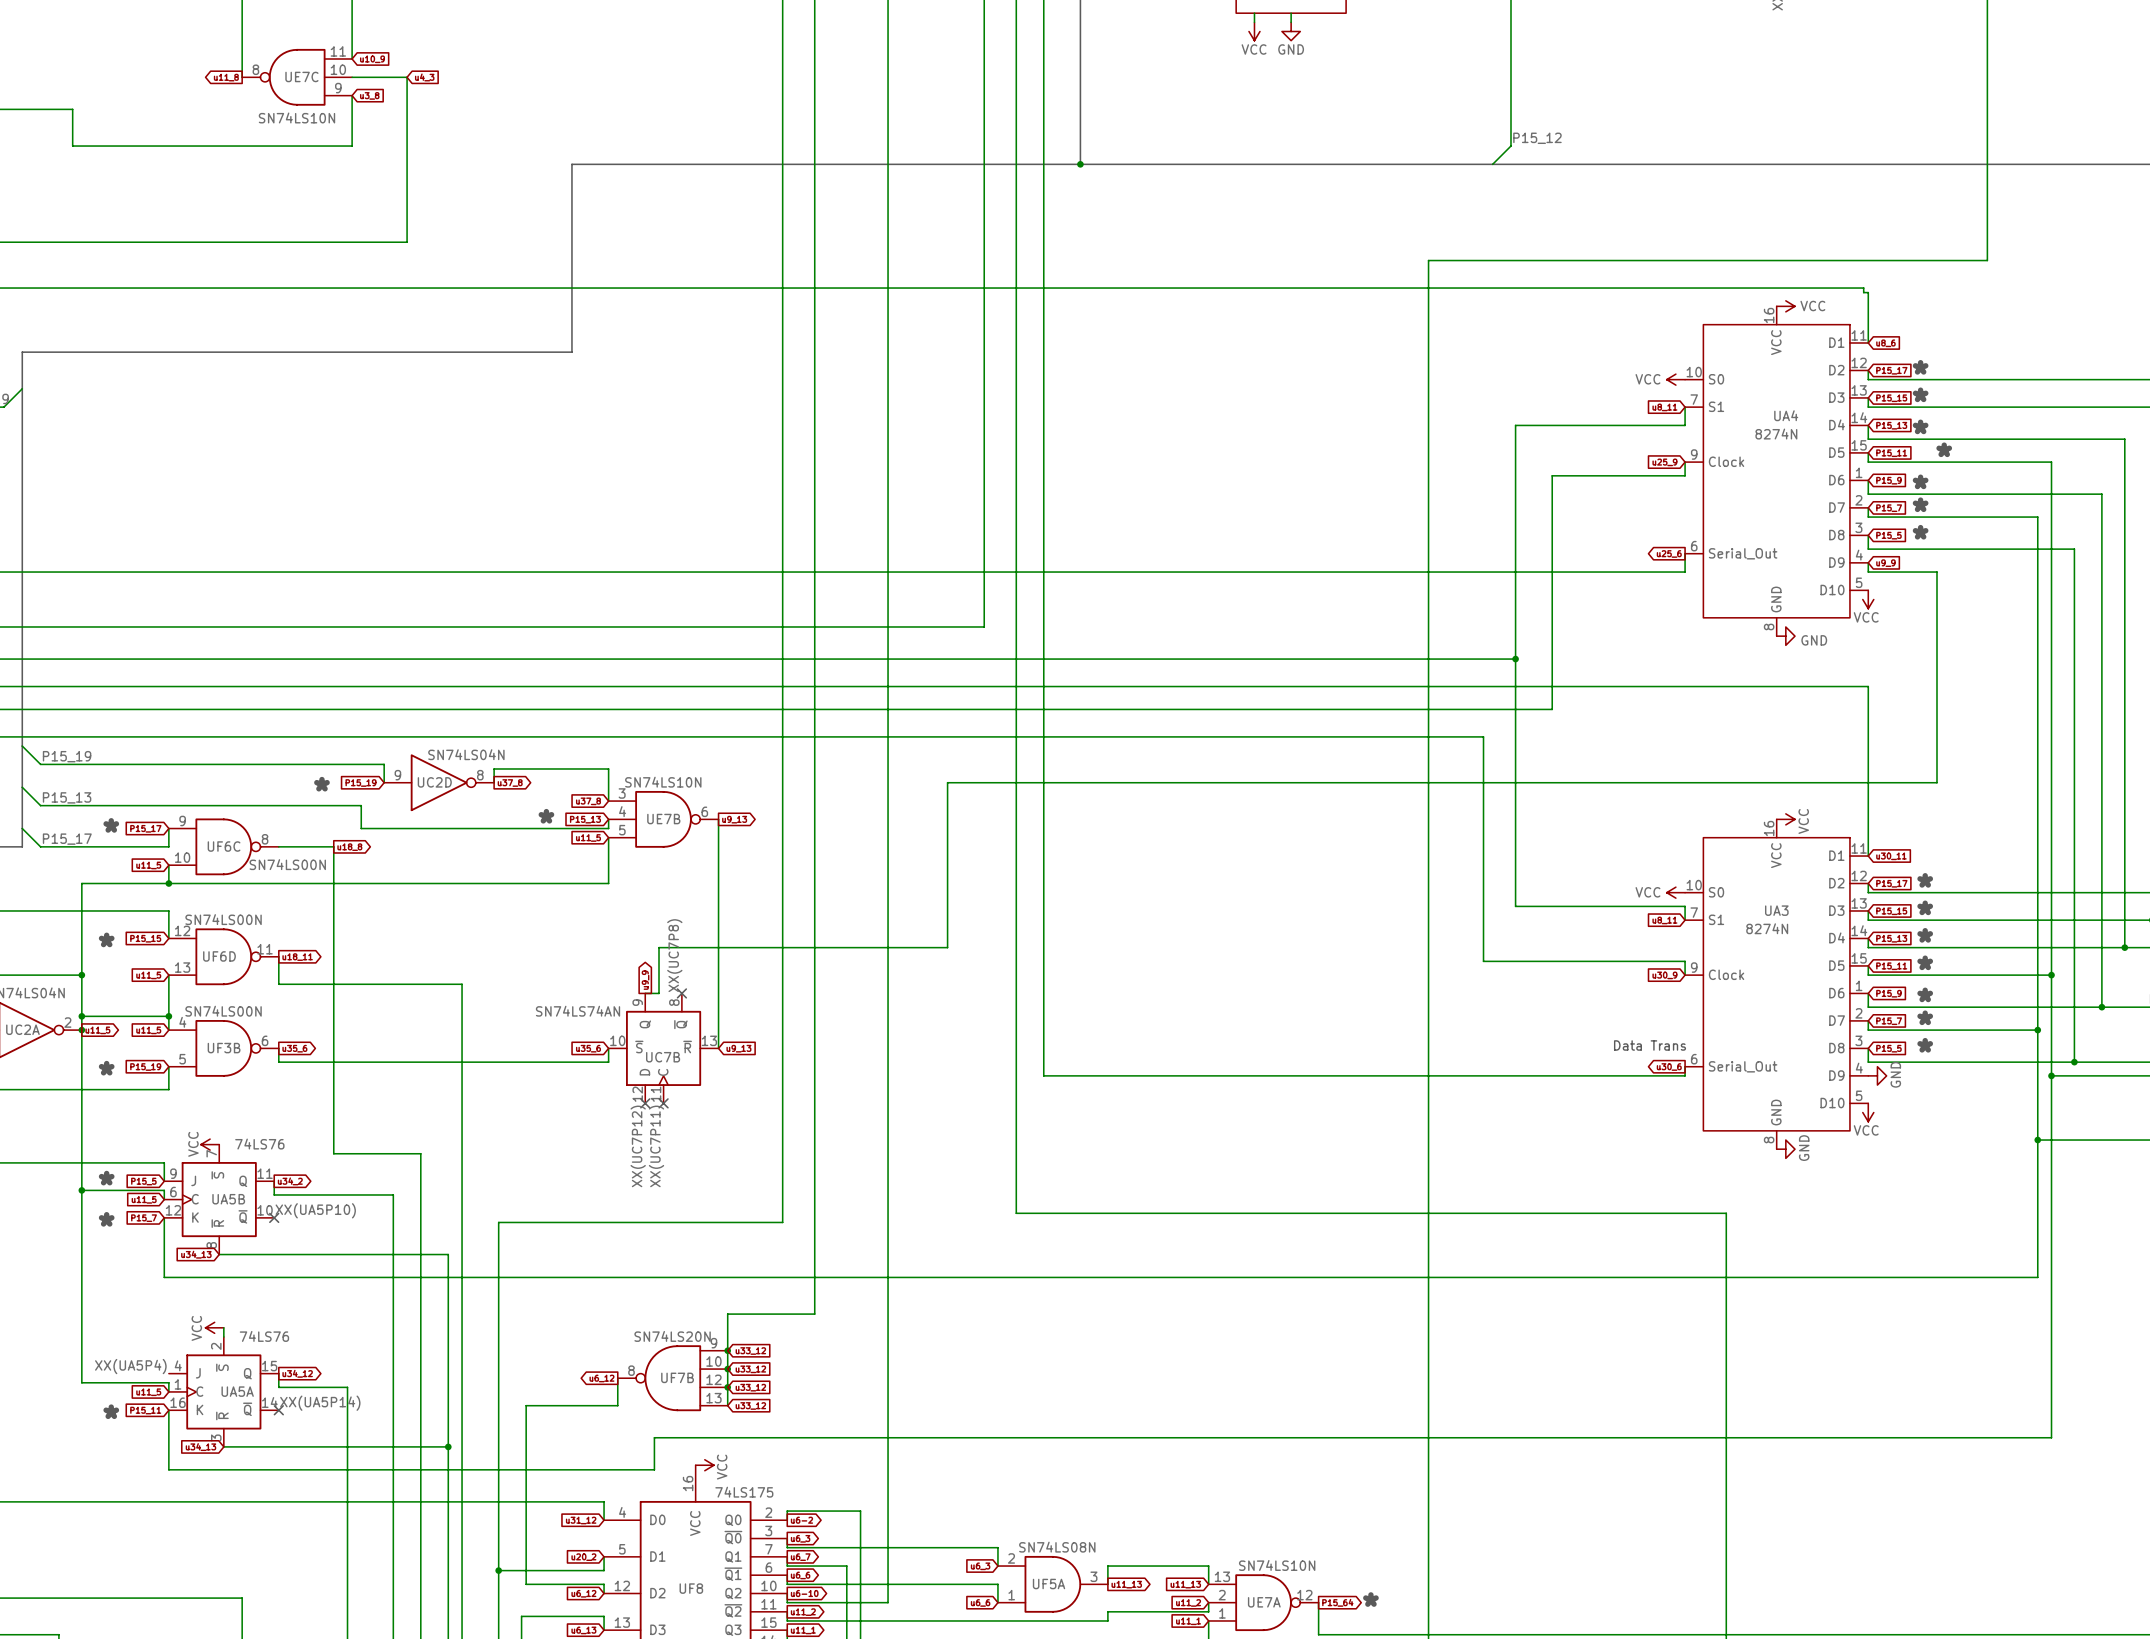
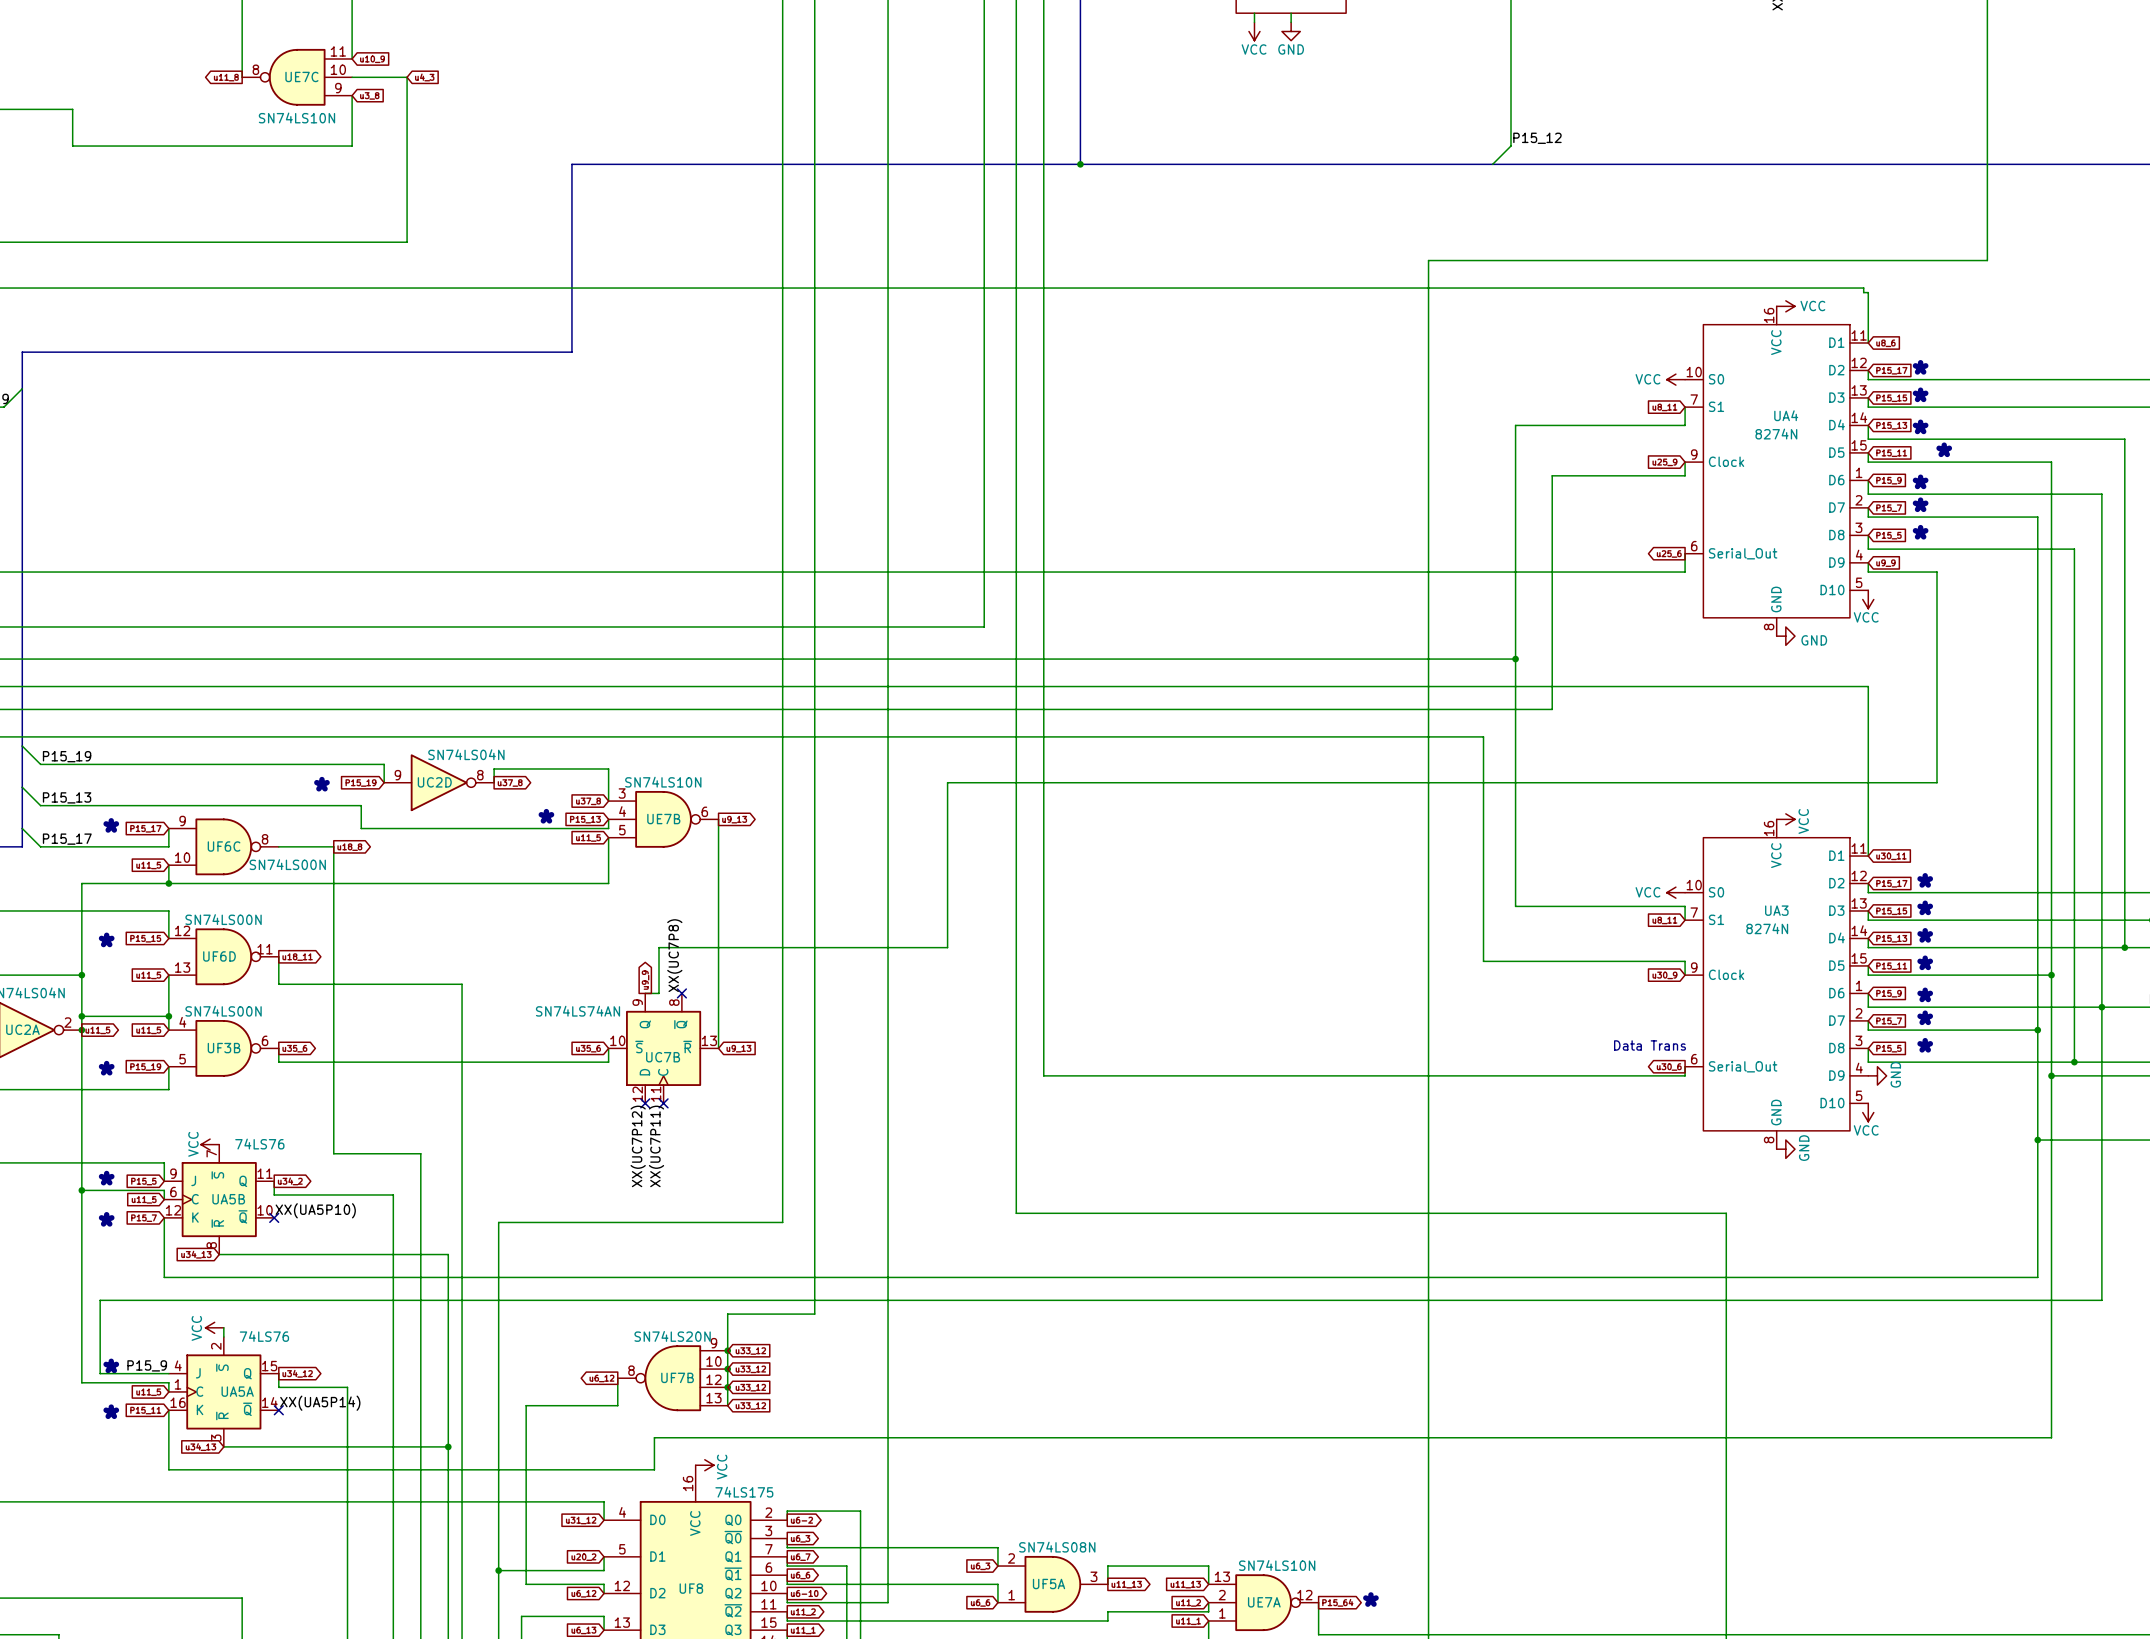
wire: none -> (2101, 1007) (2101, 1300) (100, 1300) (100, 1373) (168, 1373)
text: none -> * (111, 1365)
label: XX(UA5P4) (130, 1366) -> P15_9 (147, 1365)

